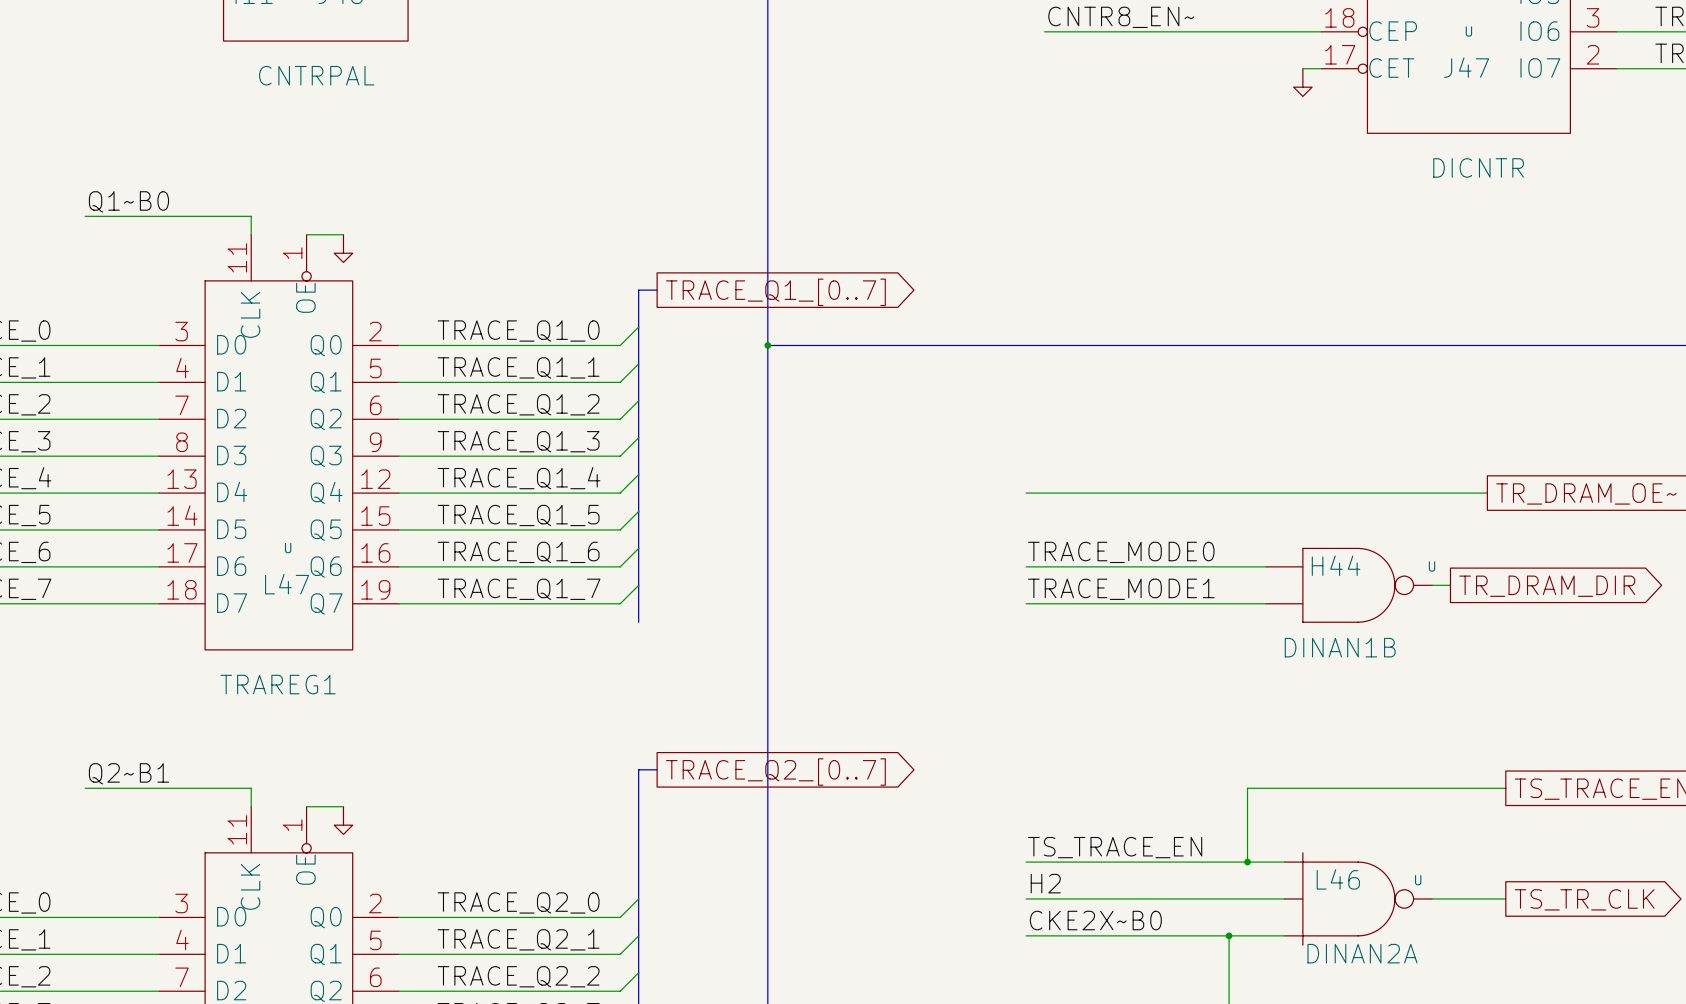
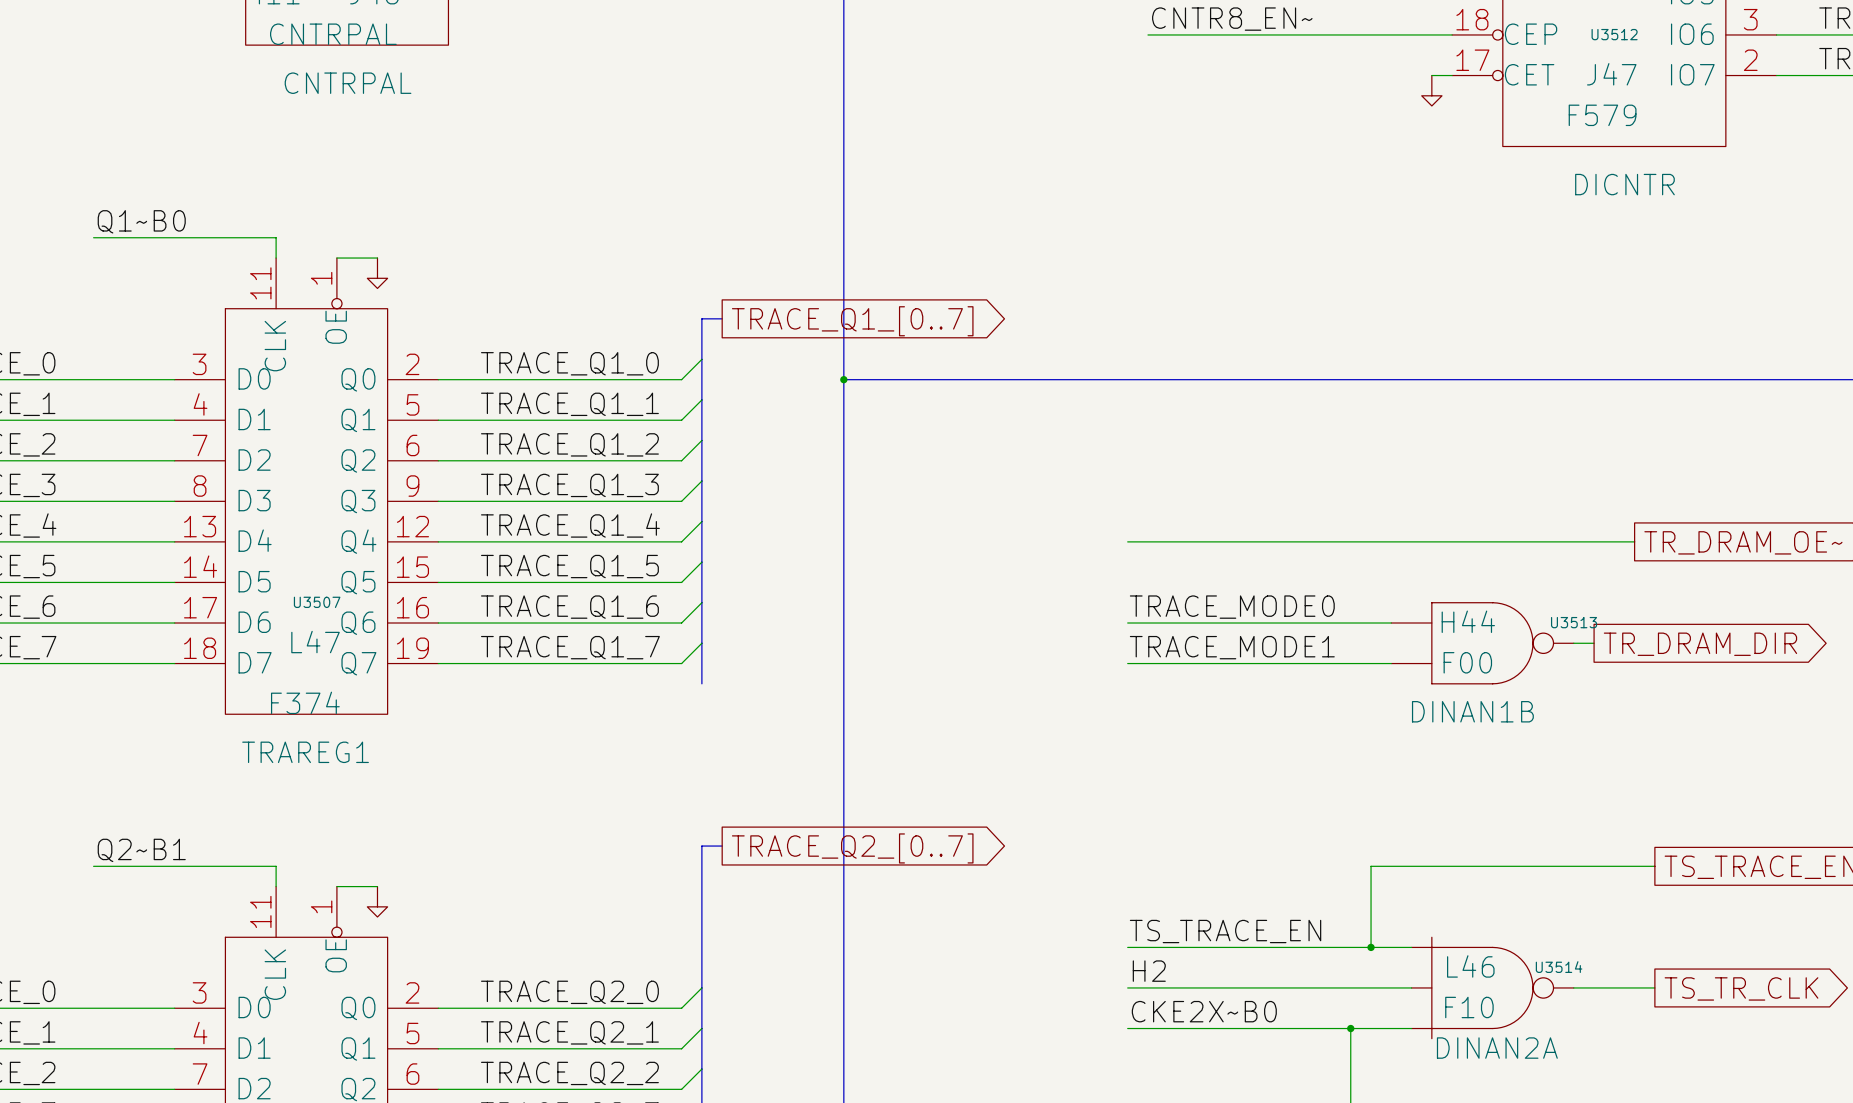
part value: none -> CNTRPAL (333, 34)
U name: U (1468, 31) -> U3512 (1614, 34)
U value: none -> F579 (1602, 115)
U name: U (288, 548) -> U3507 (317, 602)
U name: U (1432, 566) -> U3513 (1574, 622)
U value: none -> F00 (1467, 662)
U value: none -> F374 (305, 702)
U name: U (1418, 880) -> U3514 (1559, 967)
U value: none -> F10 (1469, 1007)

